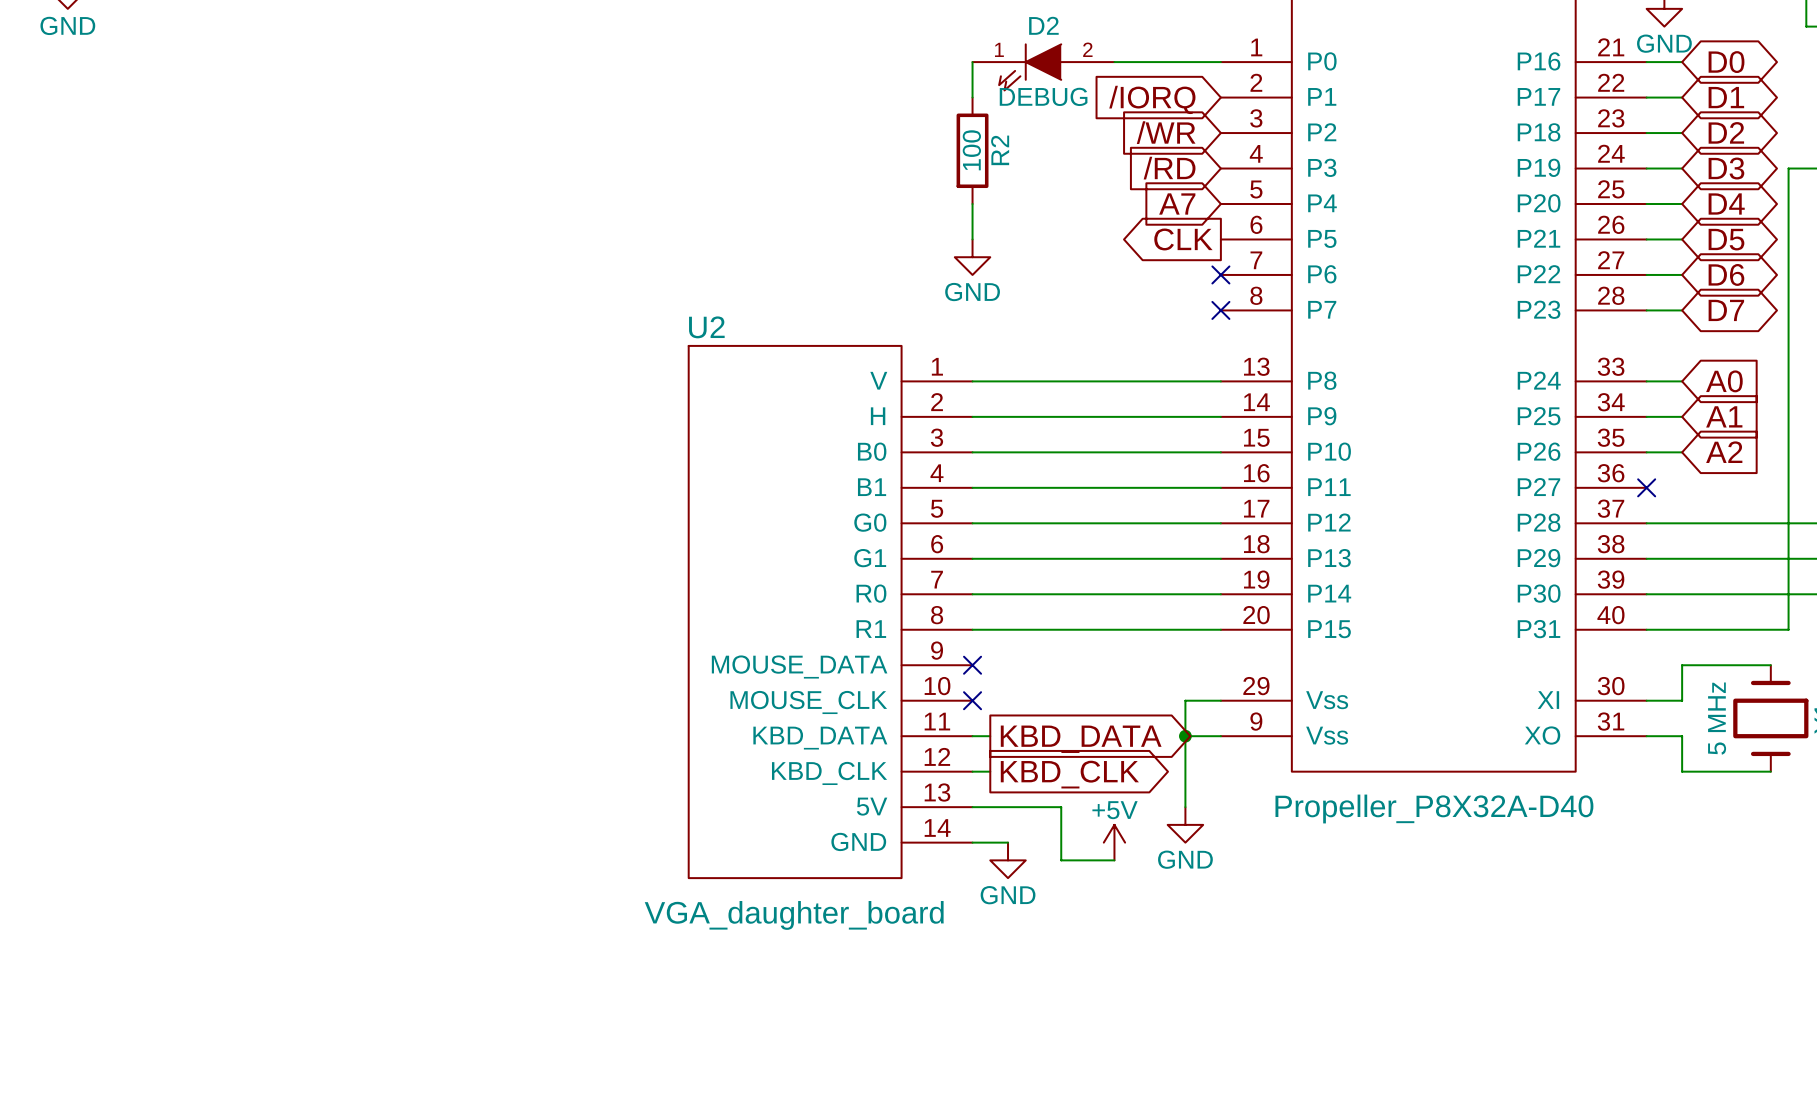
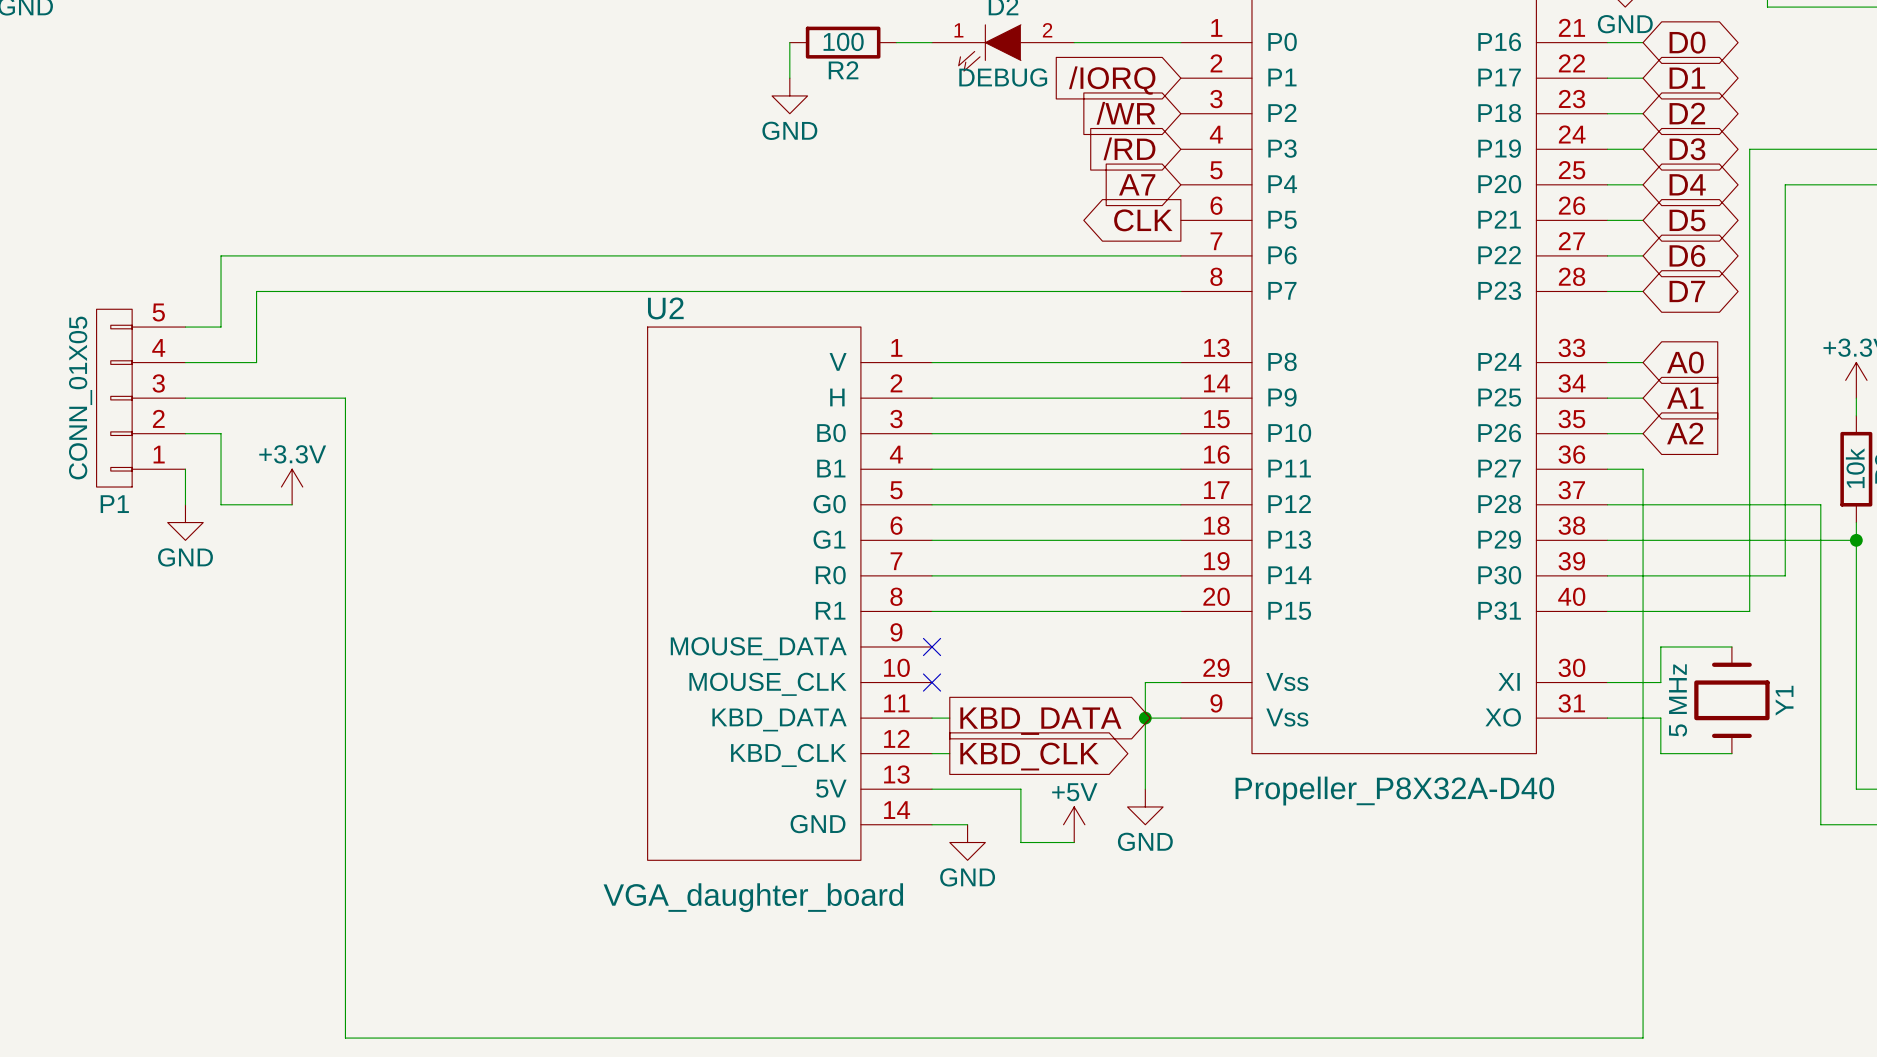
wire: (972, 62) (972, 97) -> (932, 42) (896, 42)
R2 rotation: 0° (972, 150) -> 90° clockwise (843, 42)
R2 position: (972, 150) -> (843, 42)
wire: (972, 204) (972, 239) -> (789, 42) (789, 78)
power symbol position: GND (972, 257) -> GND (789, 95)
wire: none -> (1180, 255) (221, 255) (221, 327) (185, 327)
no-connect mark: (1220, 274) -> none
wire: none -> (1180, 291) (256, 291) (256, 362) (185, 362)
no-connect mark: (1220, 310) -> none
P1: none -> CONN_01X05 (141, 398)
wire: none -> (185, 433) (221, 433) (221, 504) (292, 504)
wire: none -> (185, 469) (185, 504)
wire: none -> (1607, 469) (1643, 469) (1643, 646)
no-connect mark: (1646, 487) -> none
power symbol: none -> +3.3V (292, 487)
power symbol: none -> GND (185, 522)
wire: (1682, 665) (1699, 665) -> (1660, 753) (1660, 718) (1643, 718) (1643, 682) (1660, 682) (1660, 646)
wire: (1682, 771) (1699, 771) -> (1643, 753) (1643, 1038) (345, 1038) (345, 398) (185, 398)

